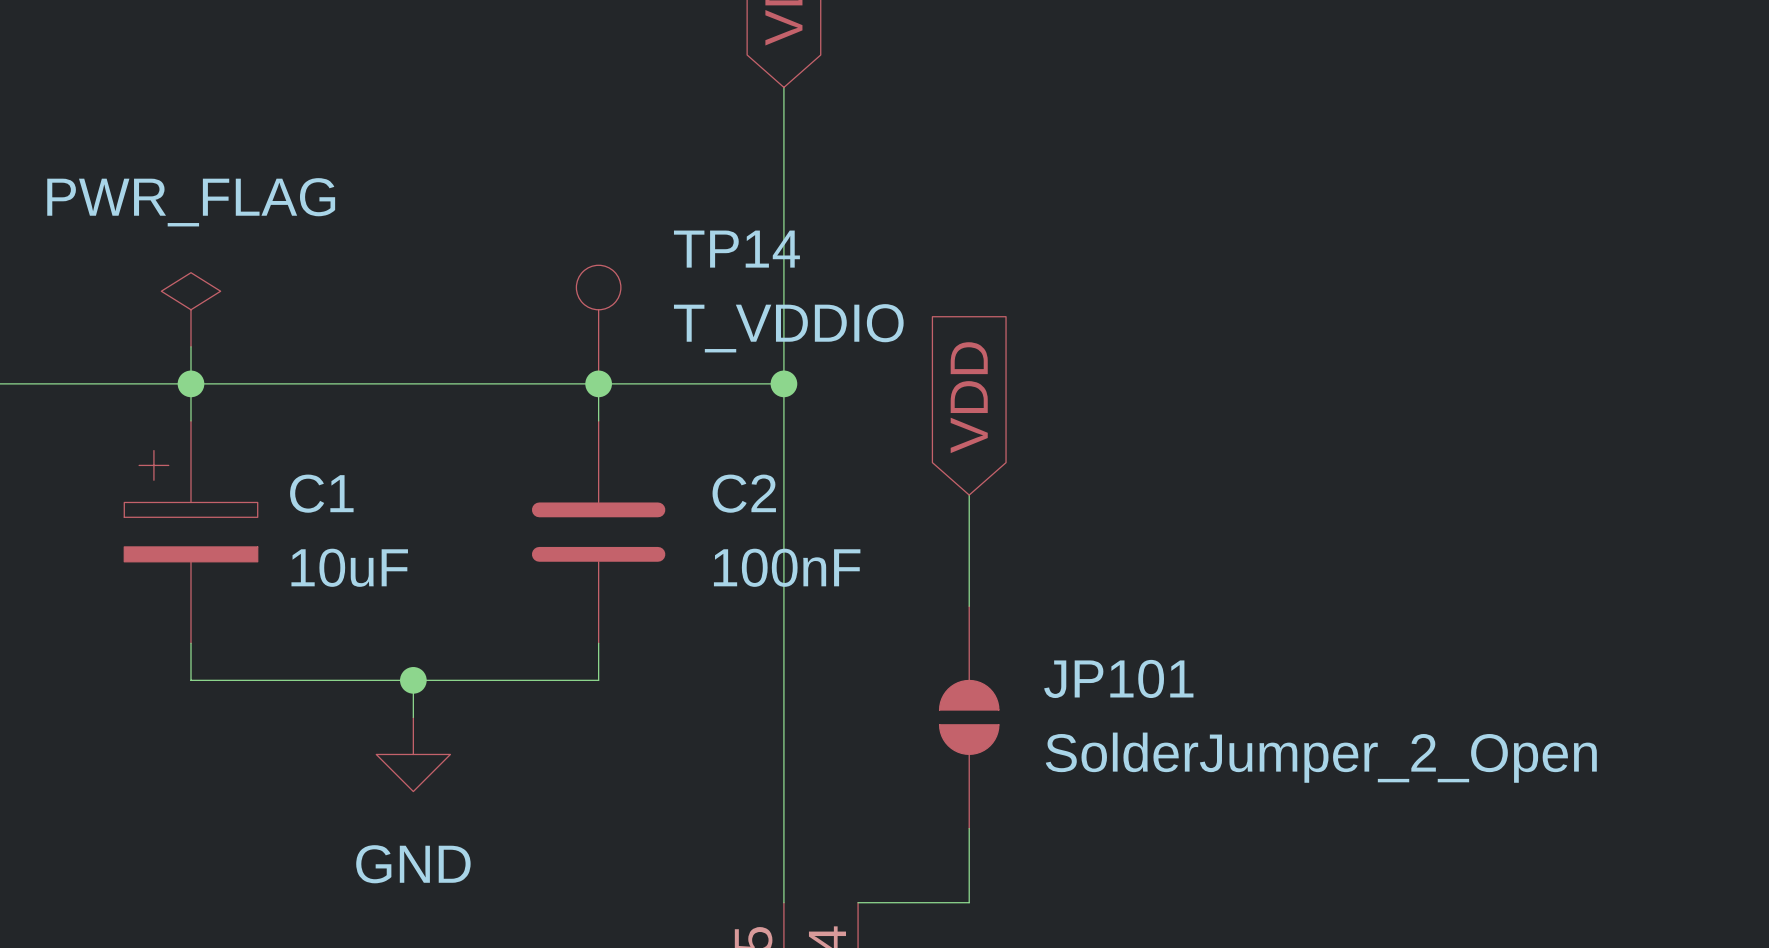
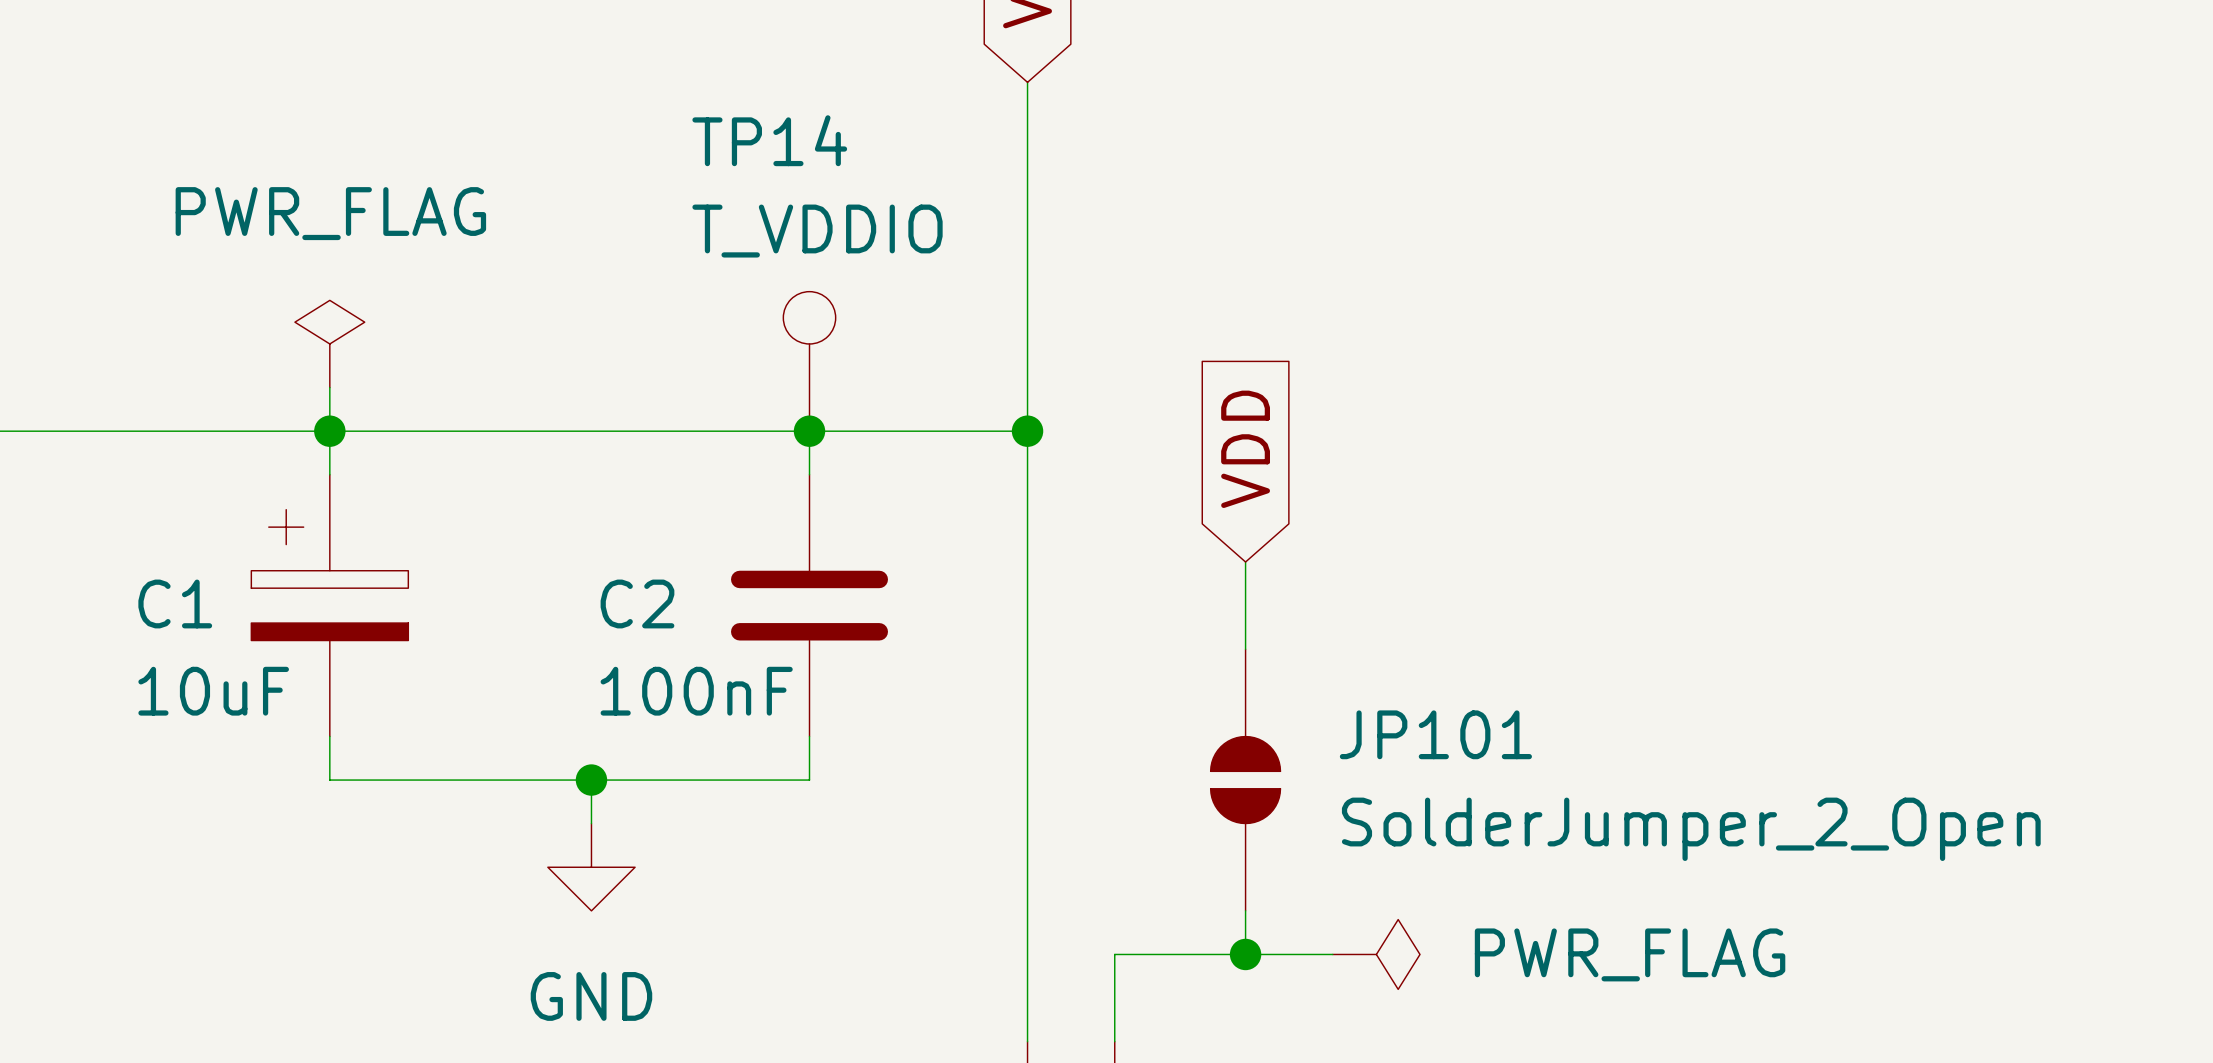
TP14 name position: TP14 (736, 249) -> TP14 (769, 140)
TP14 value position: T_VDDIO (788, 328) -> T_VDDIO (817, 231)
C1 name position: C1 (321, 493) -> C1 (175, 603)
C2 name position: C2 (744, 493) -> C2 (637, 603)
C1 value position: 10uF (349, 567) -> 10uF (213, 691)
C2 value position: 100nF (787, 567) -> 100nF (696, 691)
JP101 position: (969, 717) -> (1245, 780)
wire: (969, 828) (969, 902) (858, 902) -> (1332, 954) (1114, 954) (1114, 1041)
junction: none -> (1245, 954)
power symbol: none -> PWR_FLAG (1376, 954)

